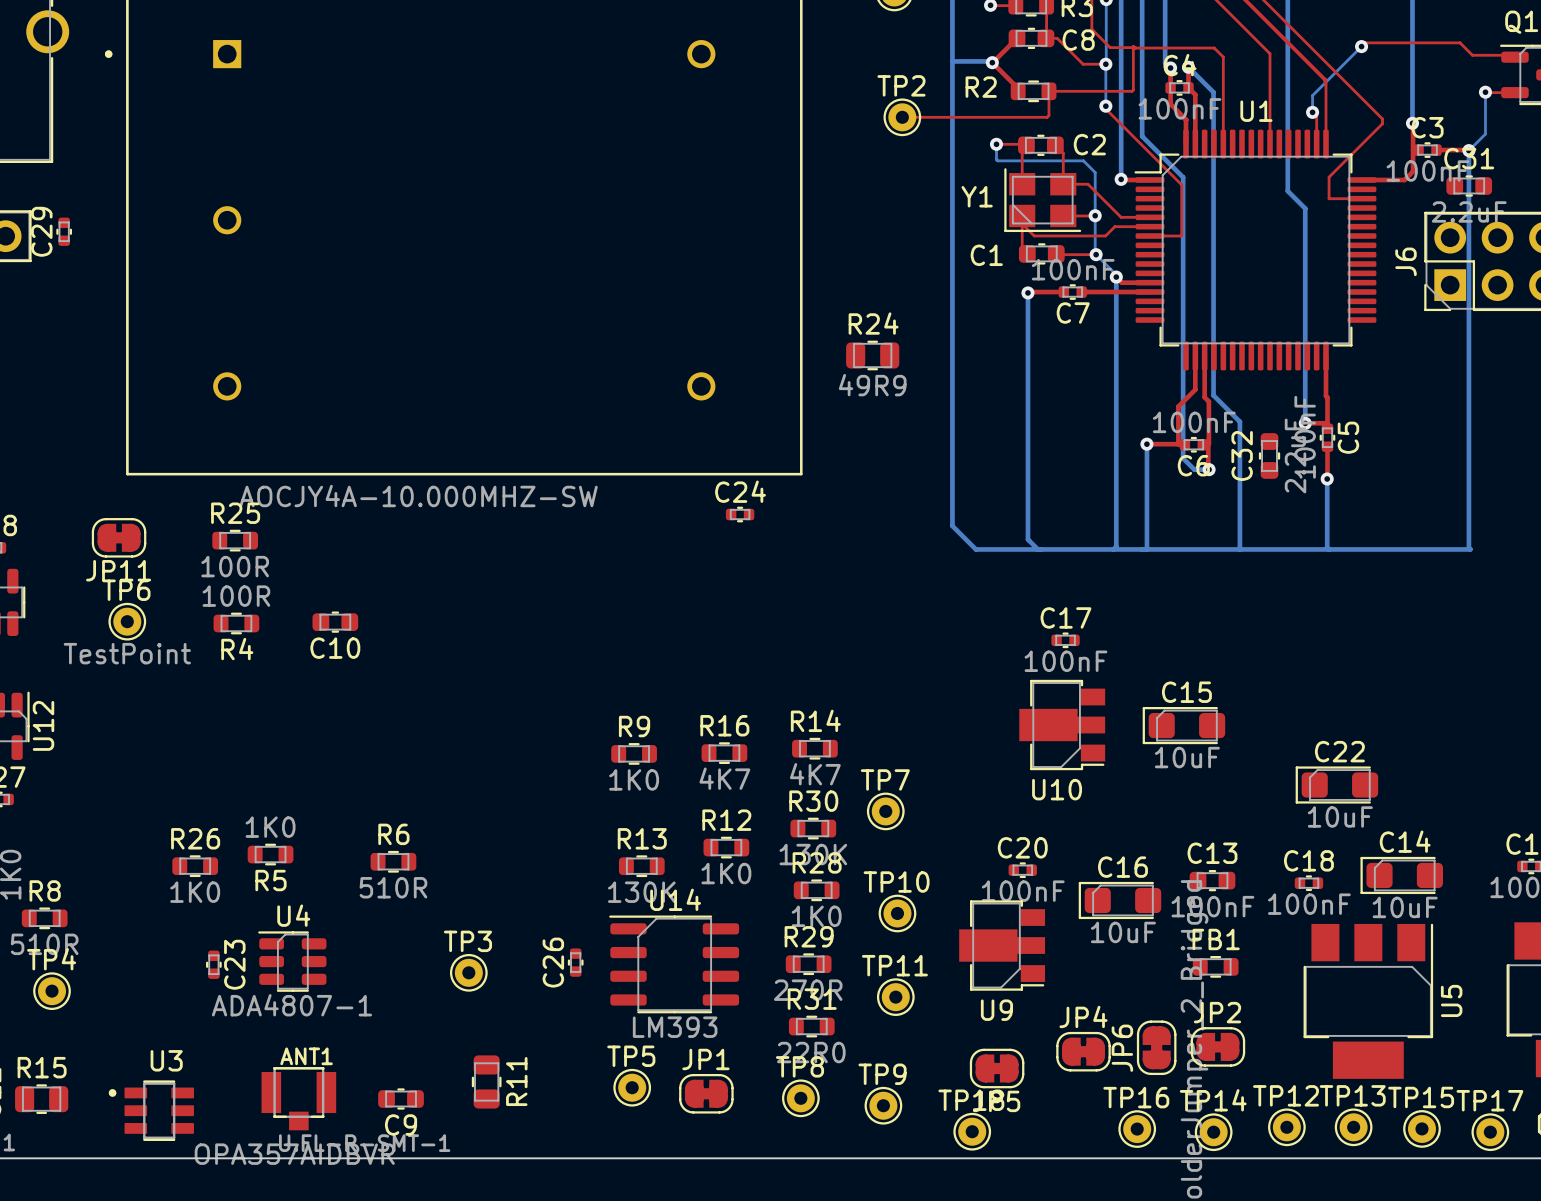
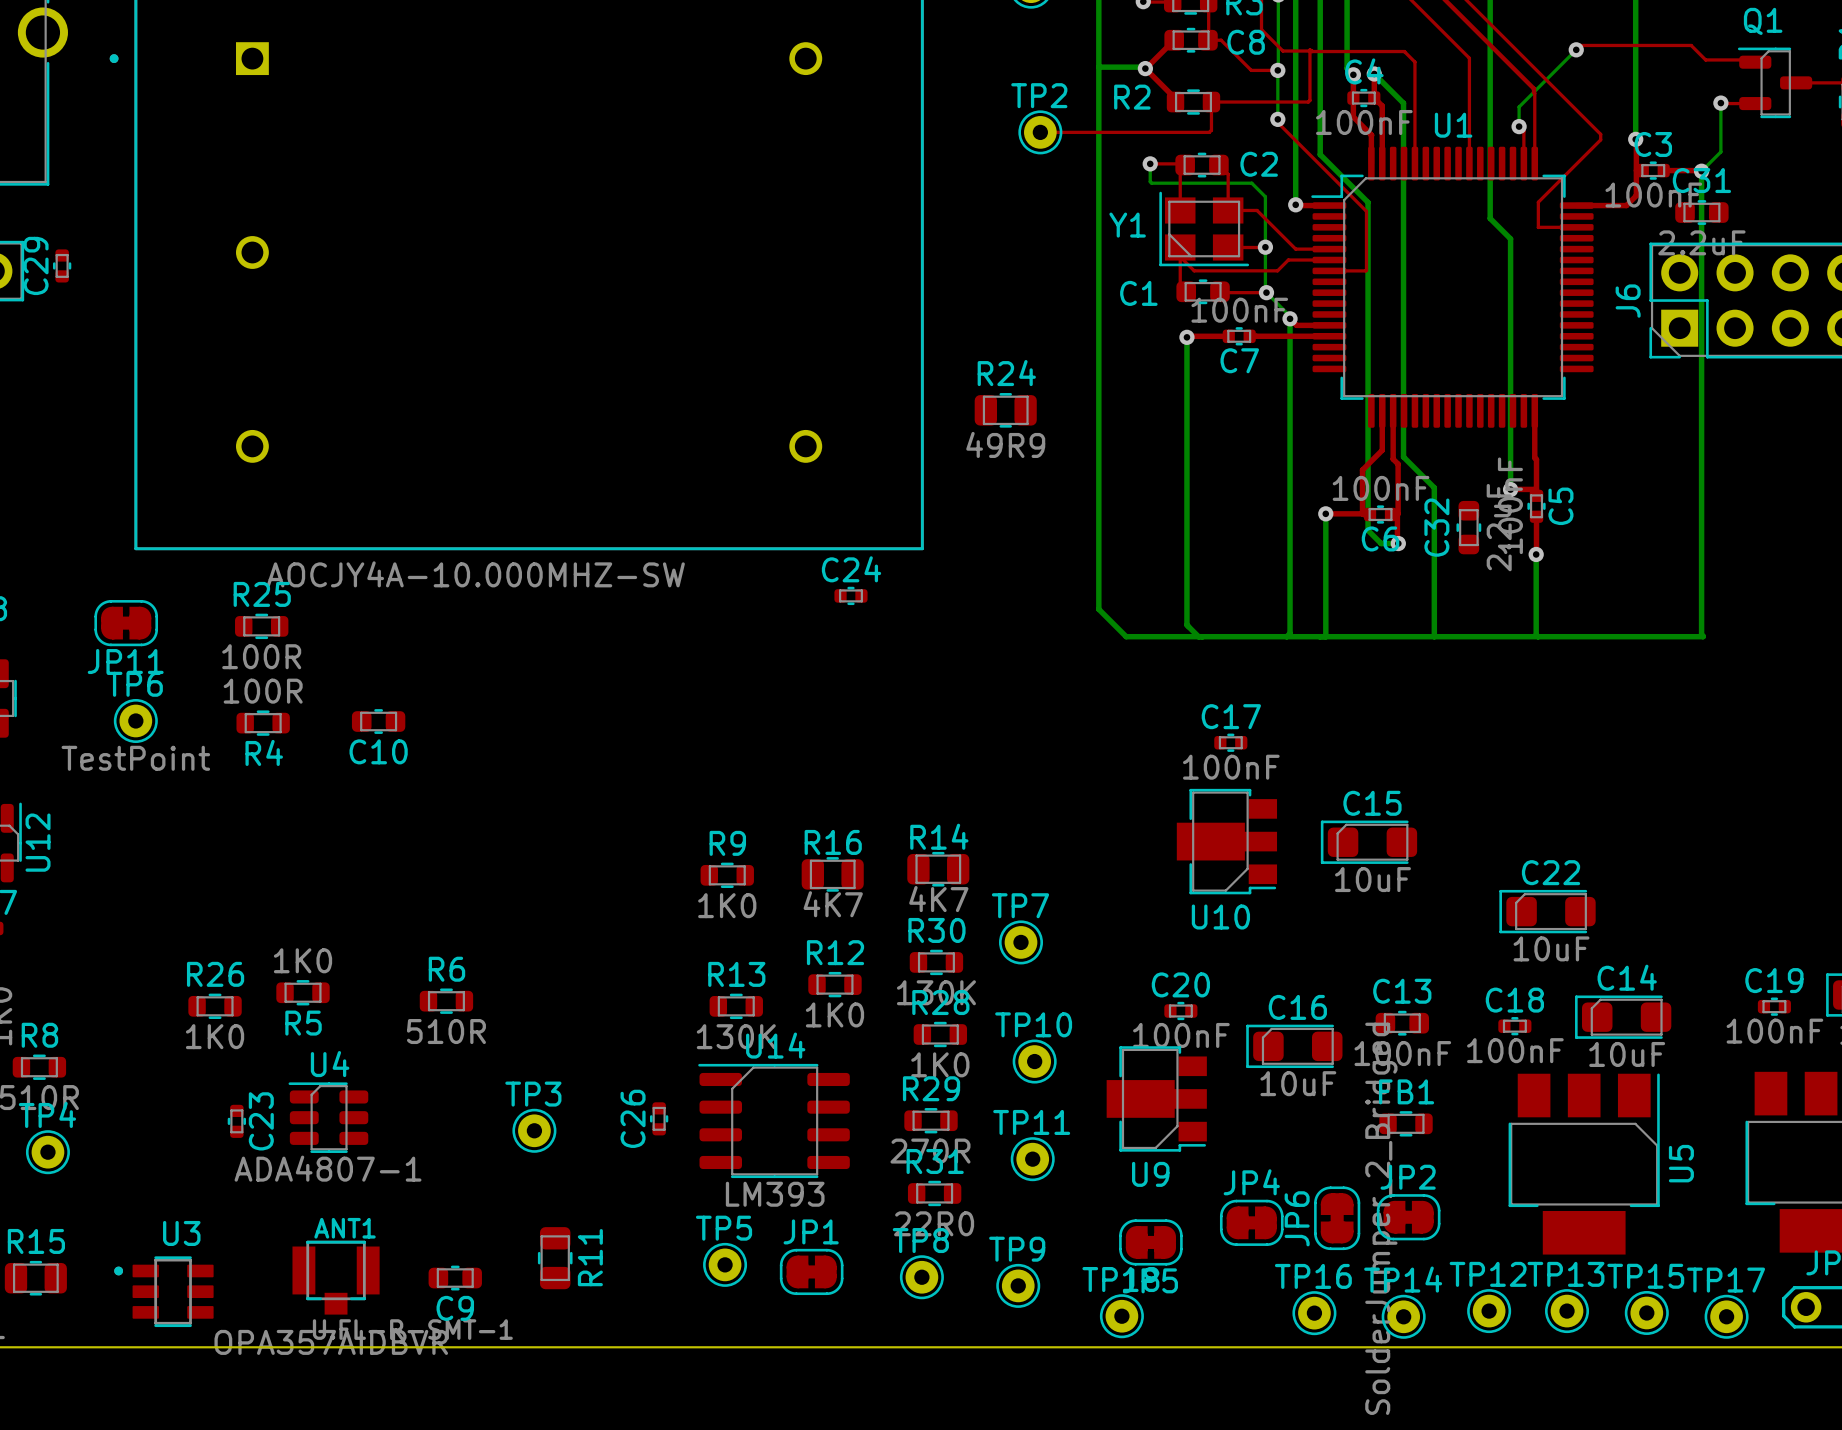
R14 footprint: [792, 737, 838, 760] -> [907, 851, 970, 887]
R16 footprint: [701, 742, 748, 765] -> [801, 857, 864, 892]

